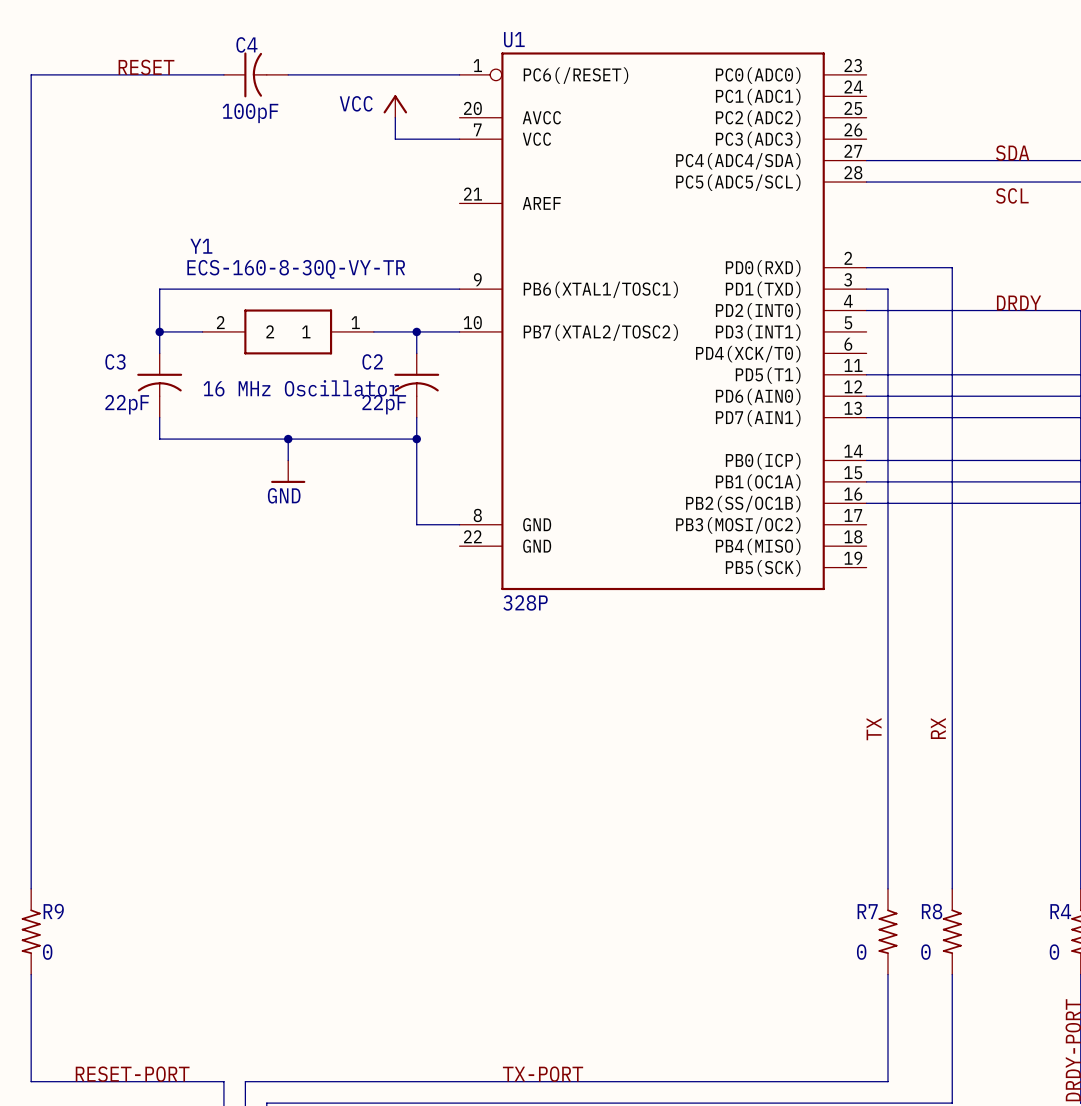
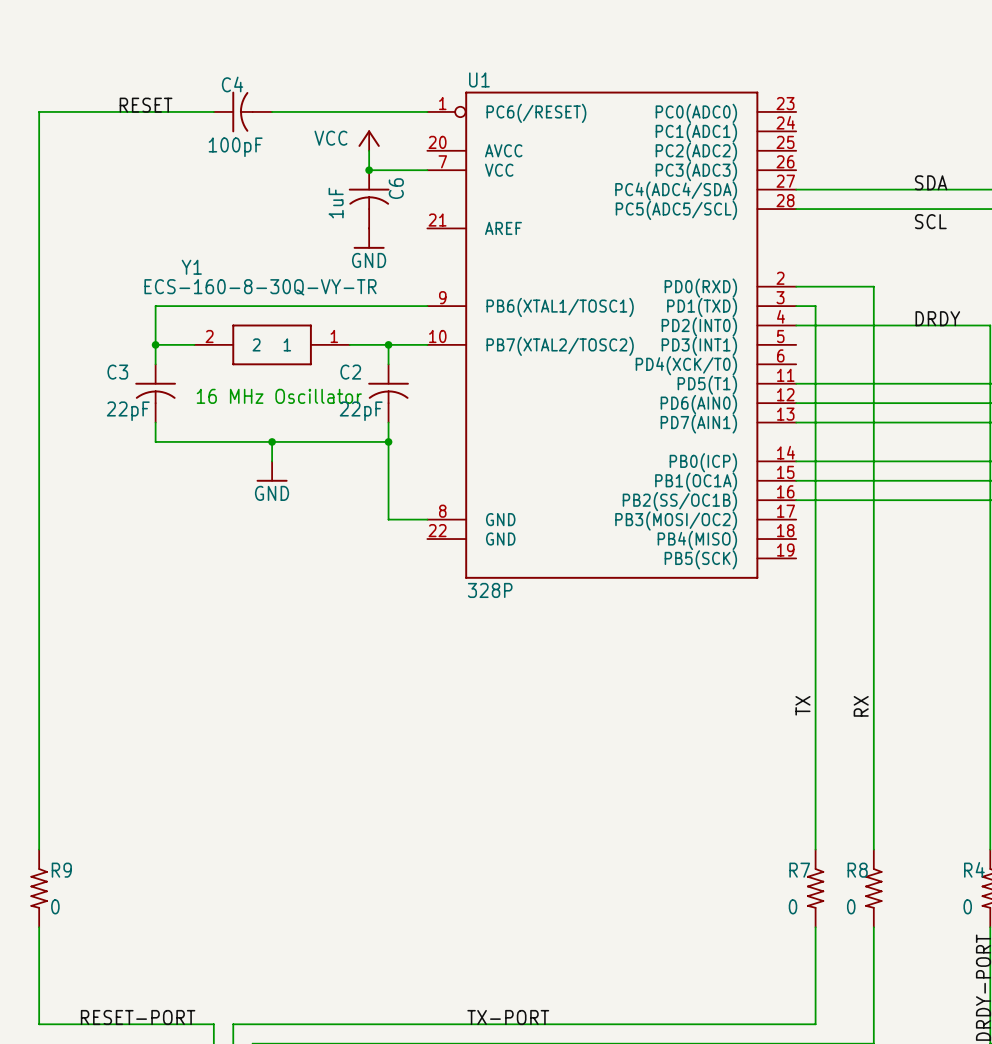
junction: none -> (369, 170)
C6: none -> 1uF (369, 199)
power symbol: none -> GND (369, 238)

